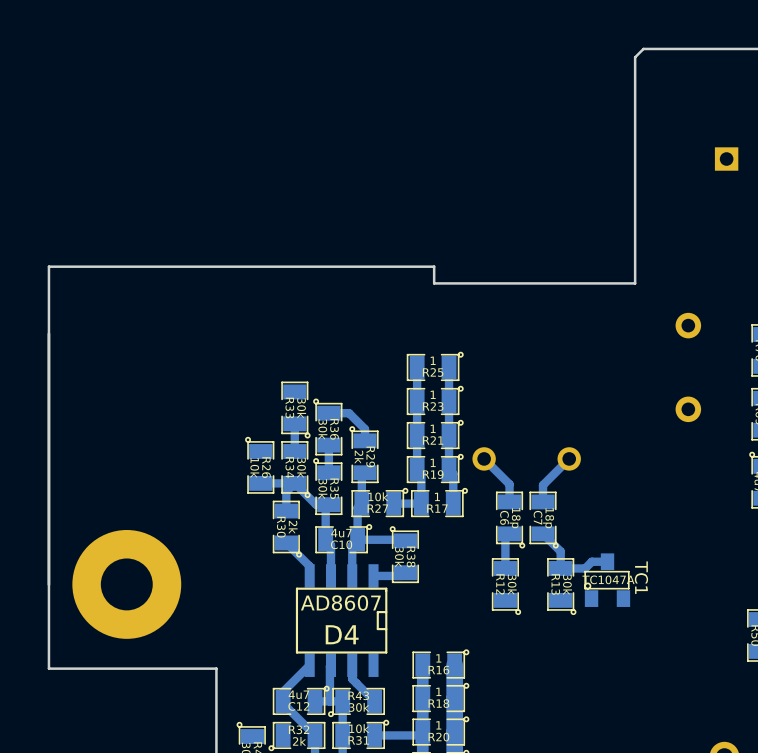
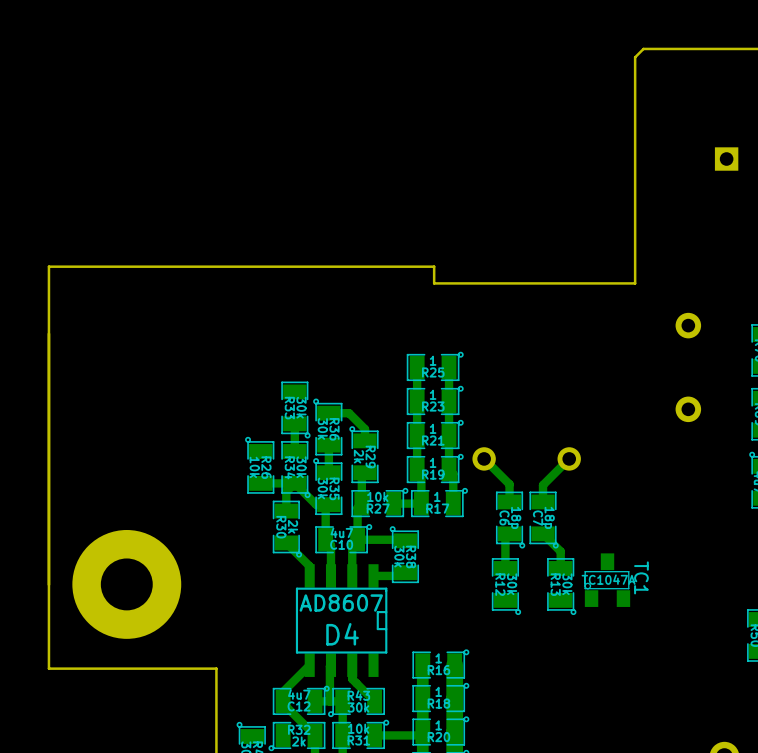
track: (607, 561) (591, 561) (585, 568) (560, 568) -> none

